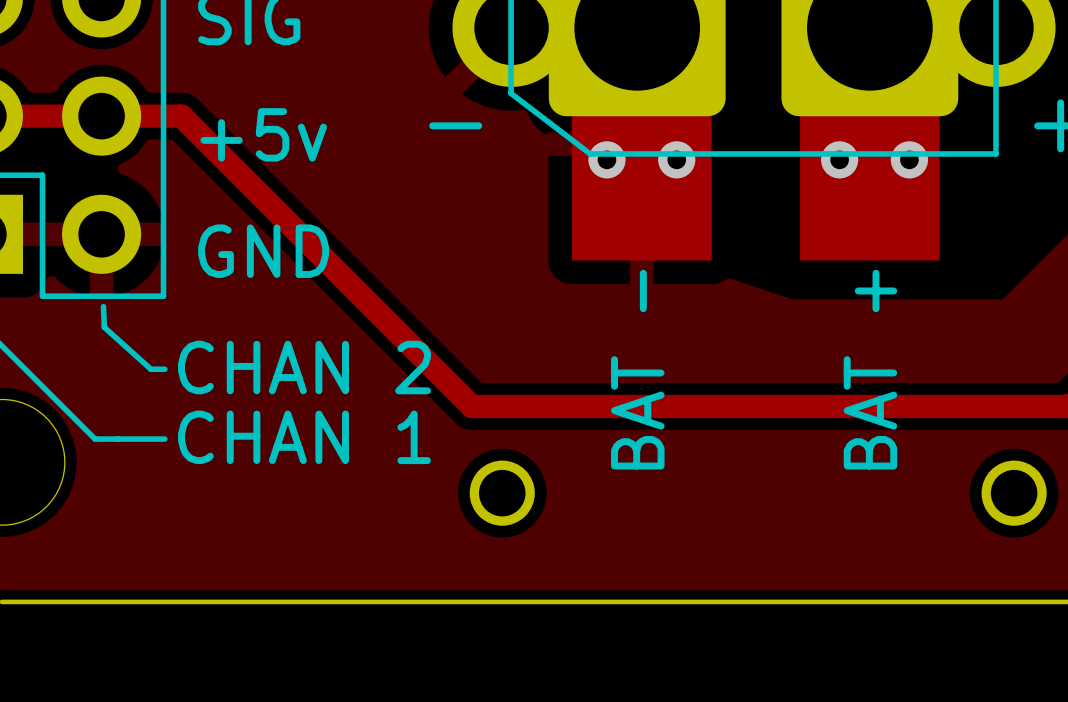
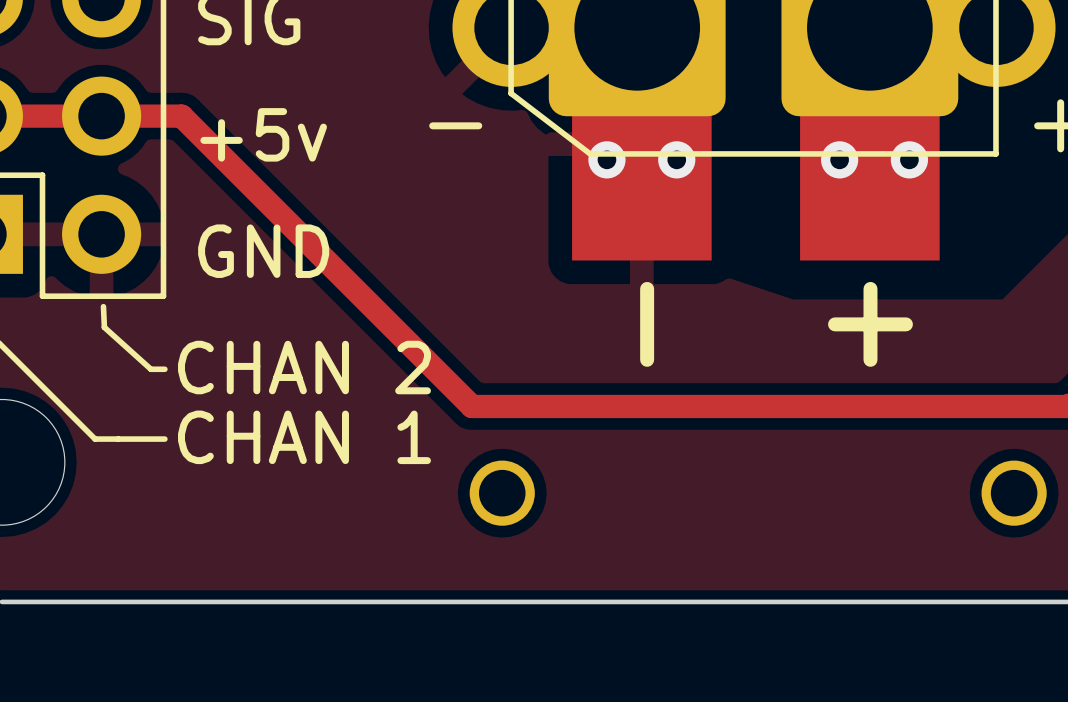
text: BAT - (637, 369) -> - (647, 324)
text: BAT + (870, 369) -> + (870, 324)

